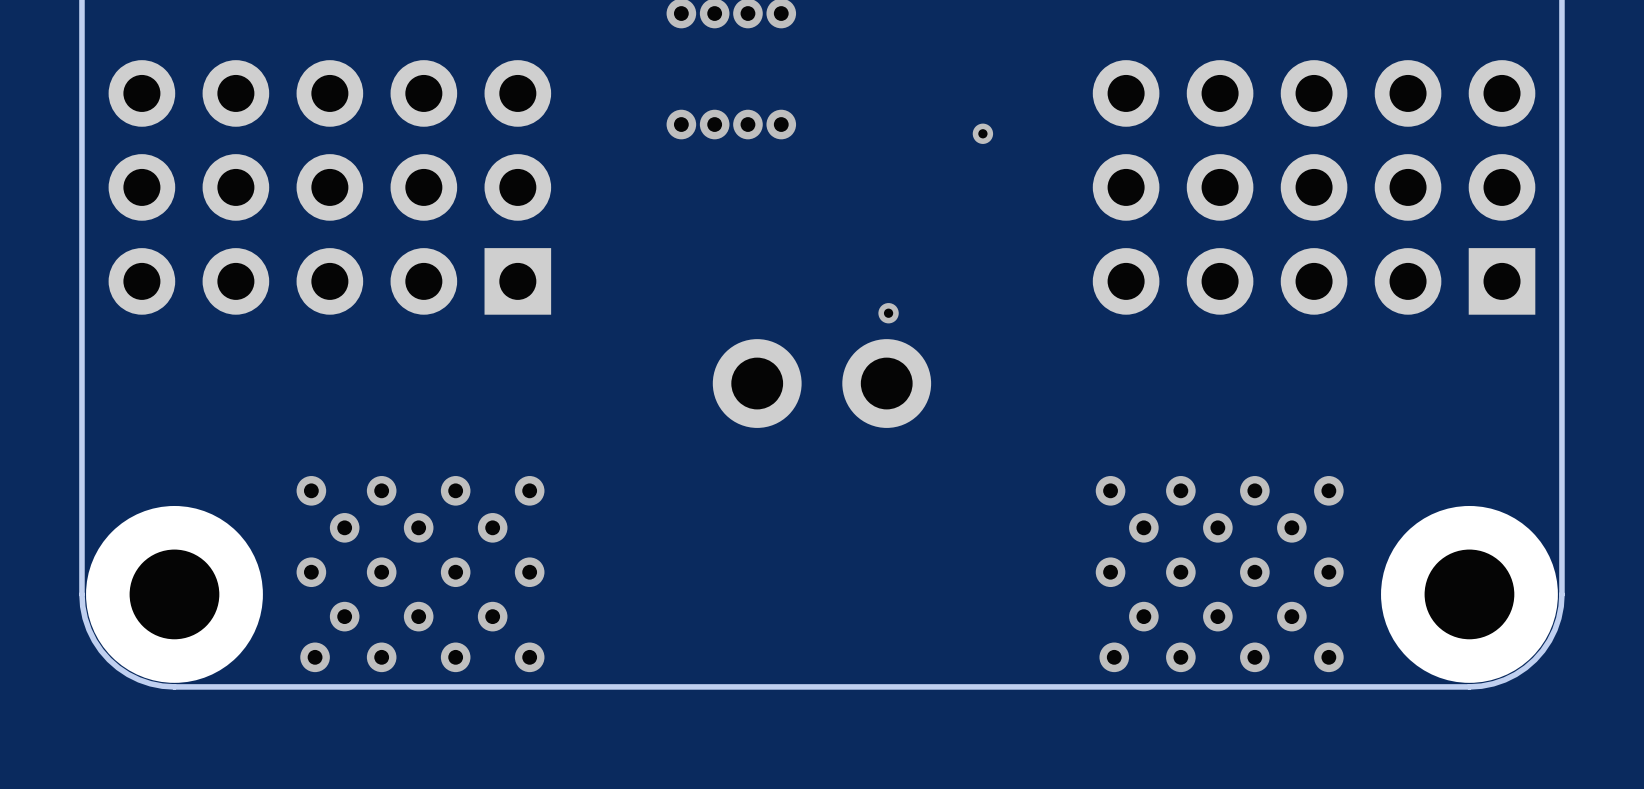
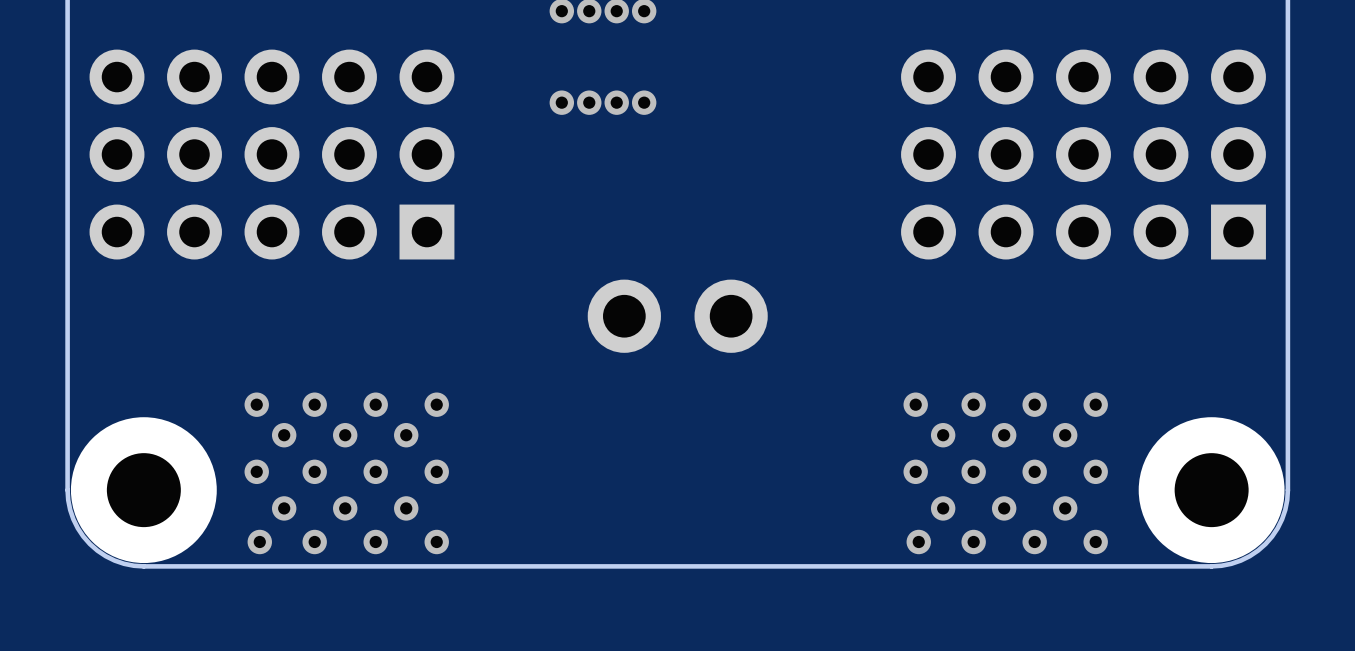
via: (982, 133) -> none
via: (888, 313) -> none

